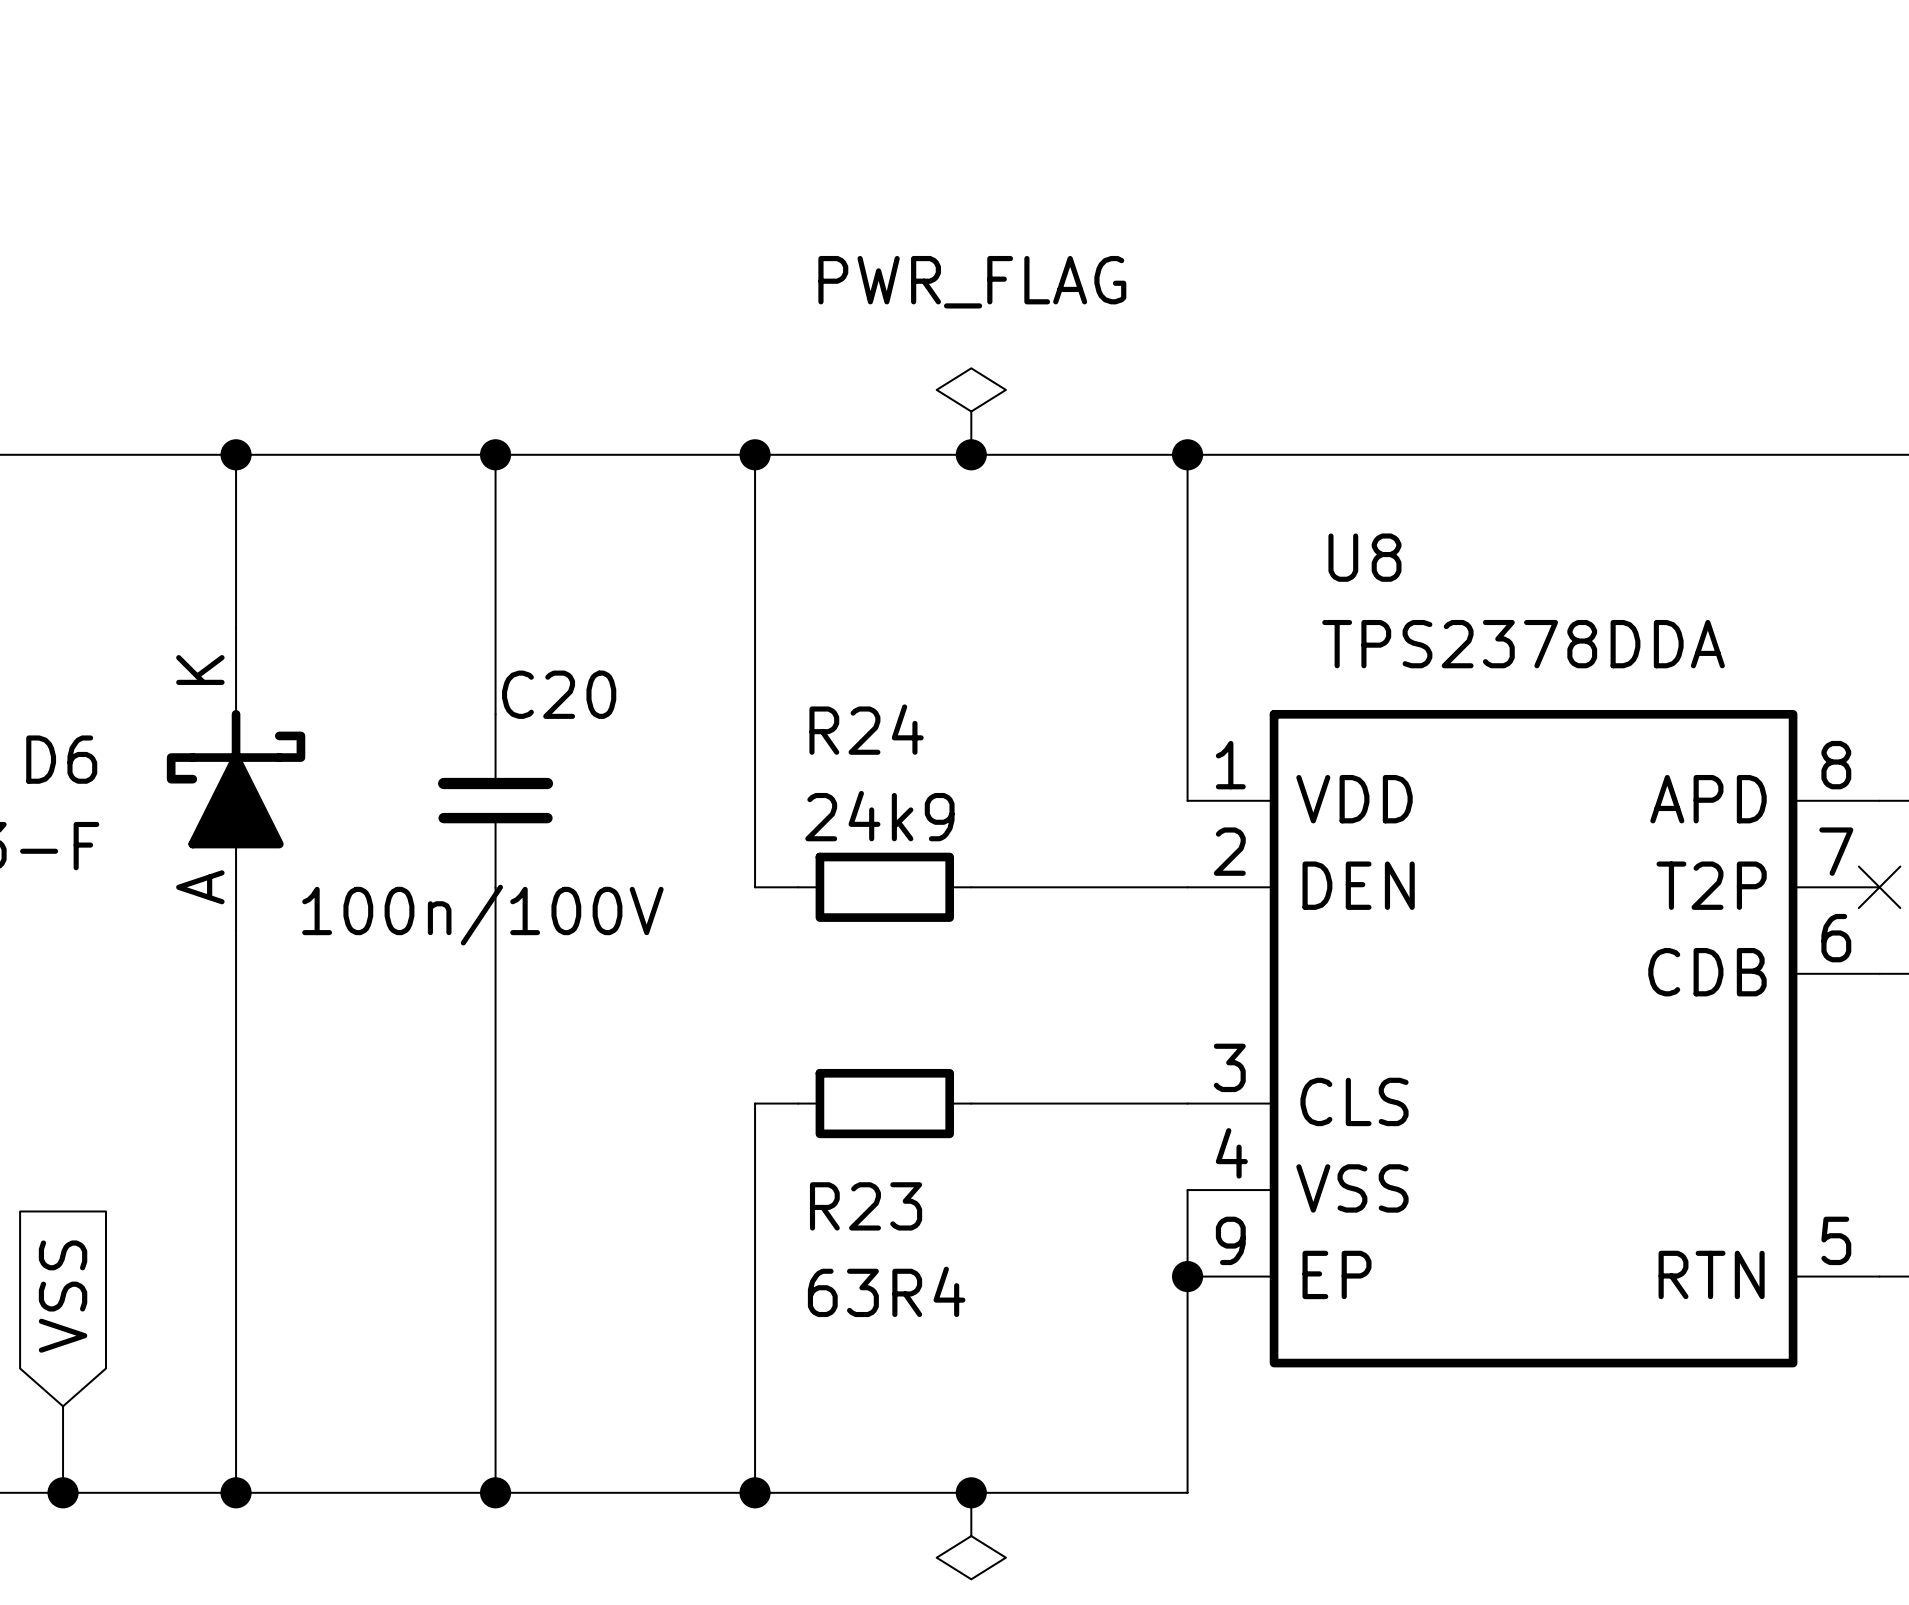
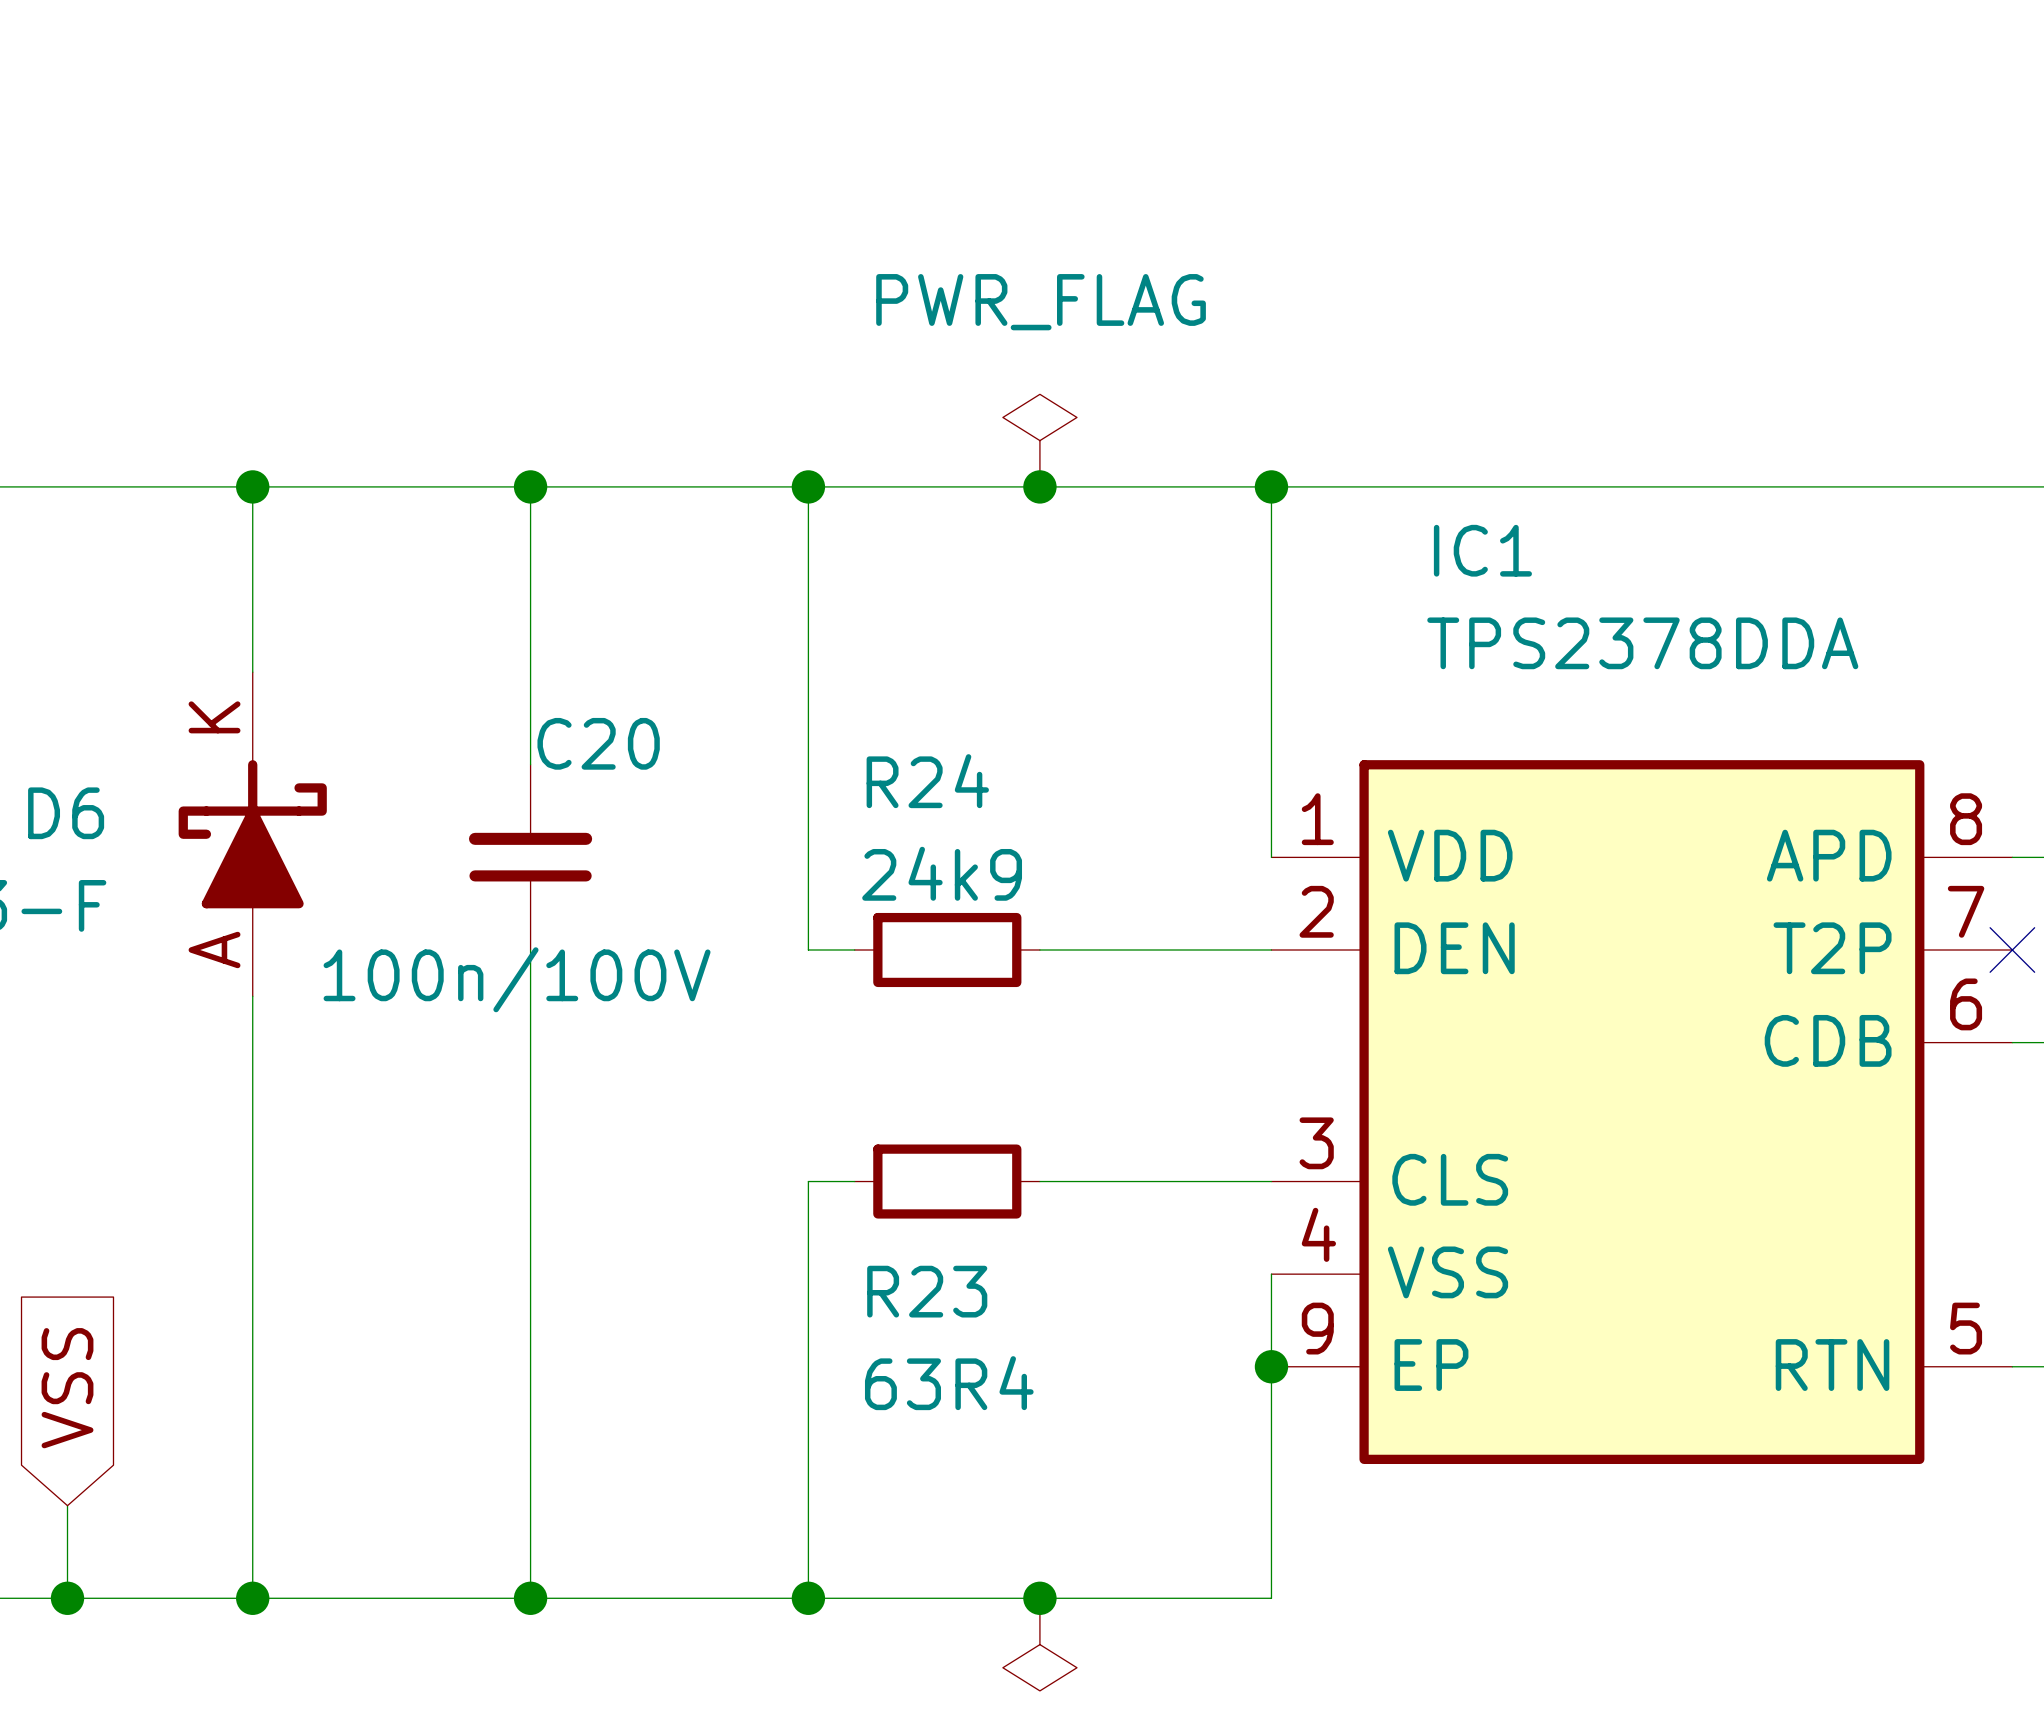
U8 name: U8 (1364, 557) -> IC1 (1482, 550)
U8 text position: TPS2378DDA (1523, 644) -> TPS2378DDA (1642, 643)

